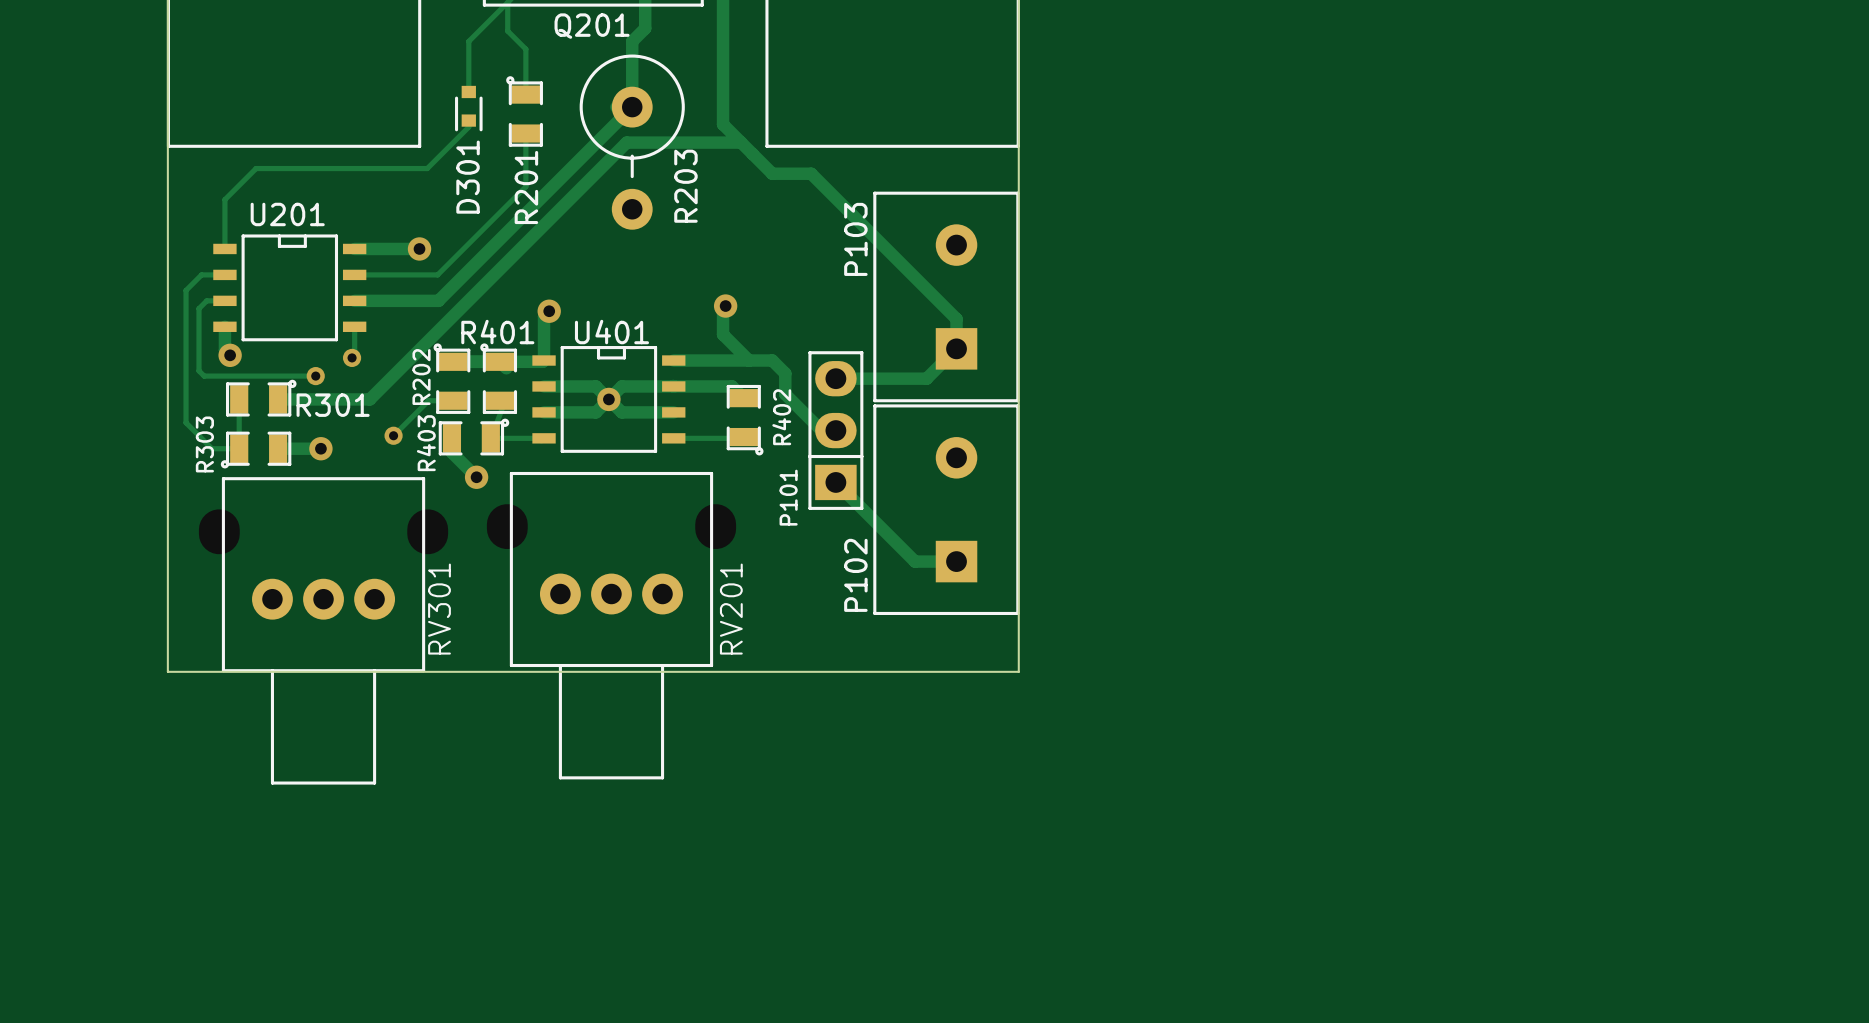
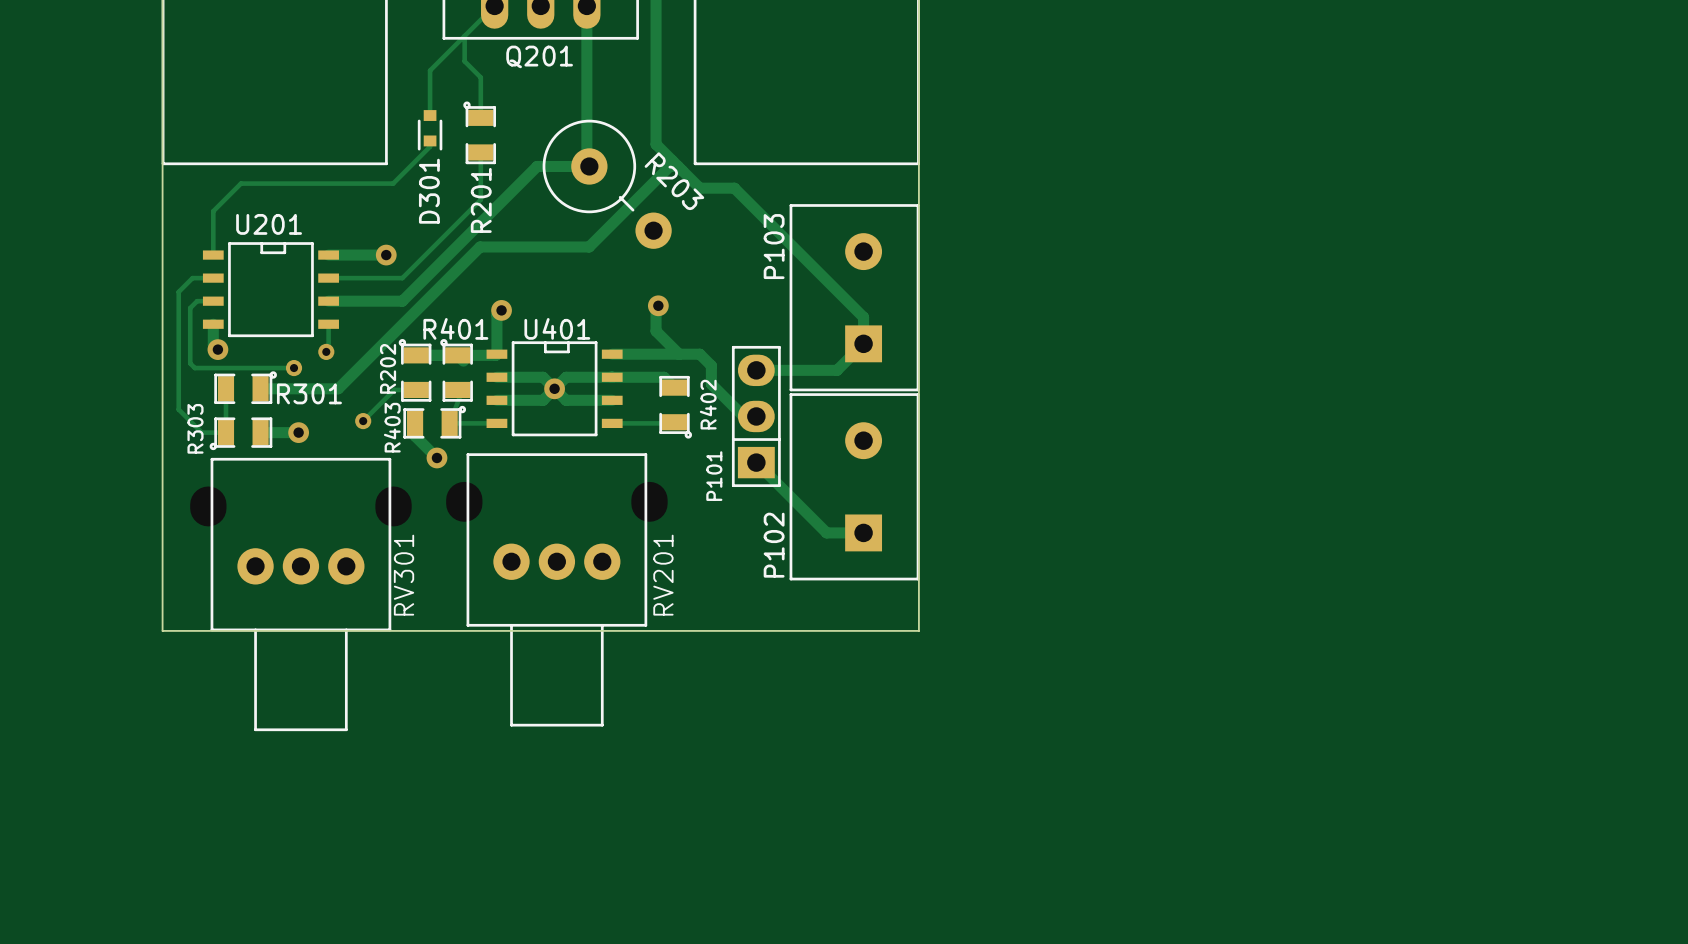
track: (645, 28) (632, 41) (632, 107) -> none
track: (632, 107) (437, 300) -> (586, 59) (586, 163) (589, 166) (537, 166) (402, 301)
R203 rotation: 0° (632, 142) -> 45° counterclockwise (607, 184)
track: (741, 142) (626, 142) (369, 399) (365, 399) -> (678, 166) (669, 166) (589, 246) (480, 246) (338, 388)

